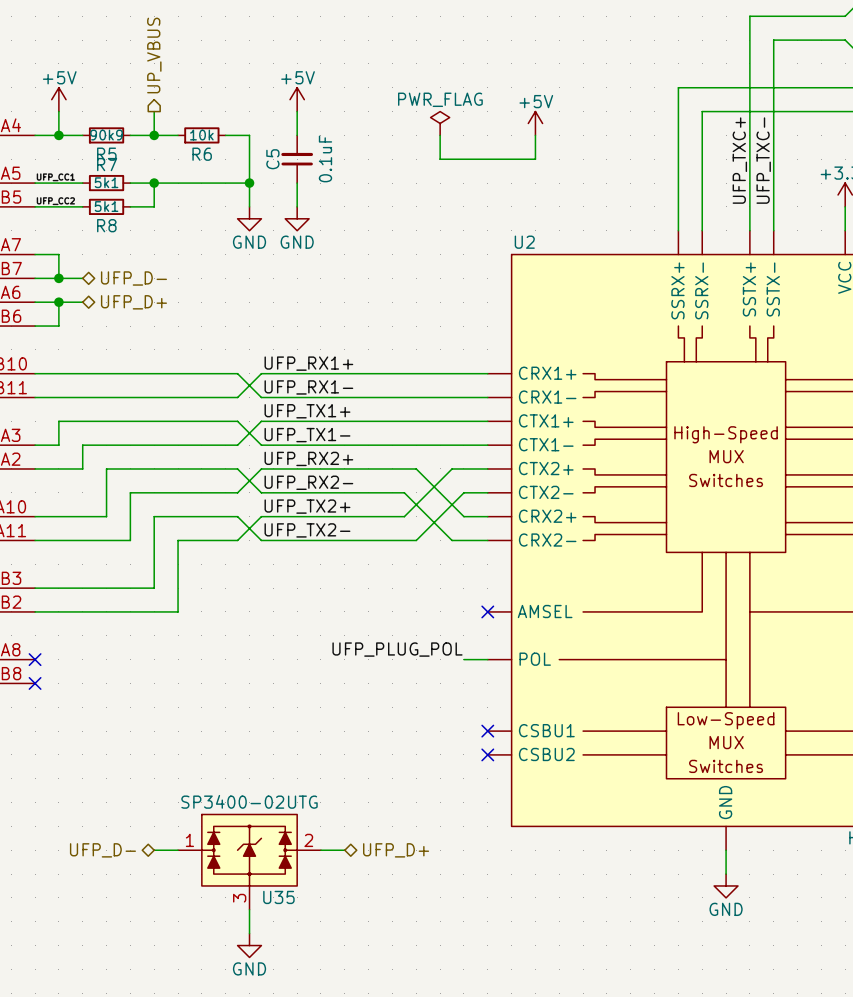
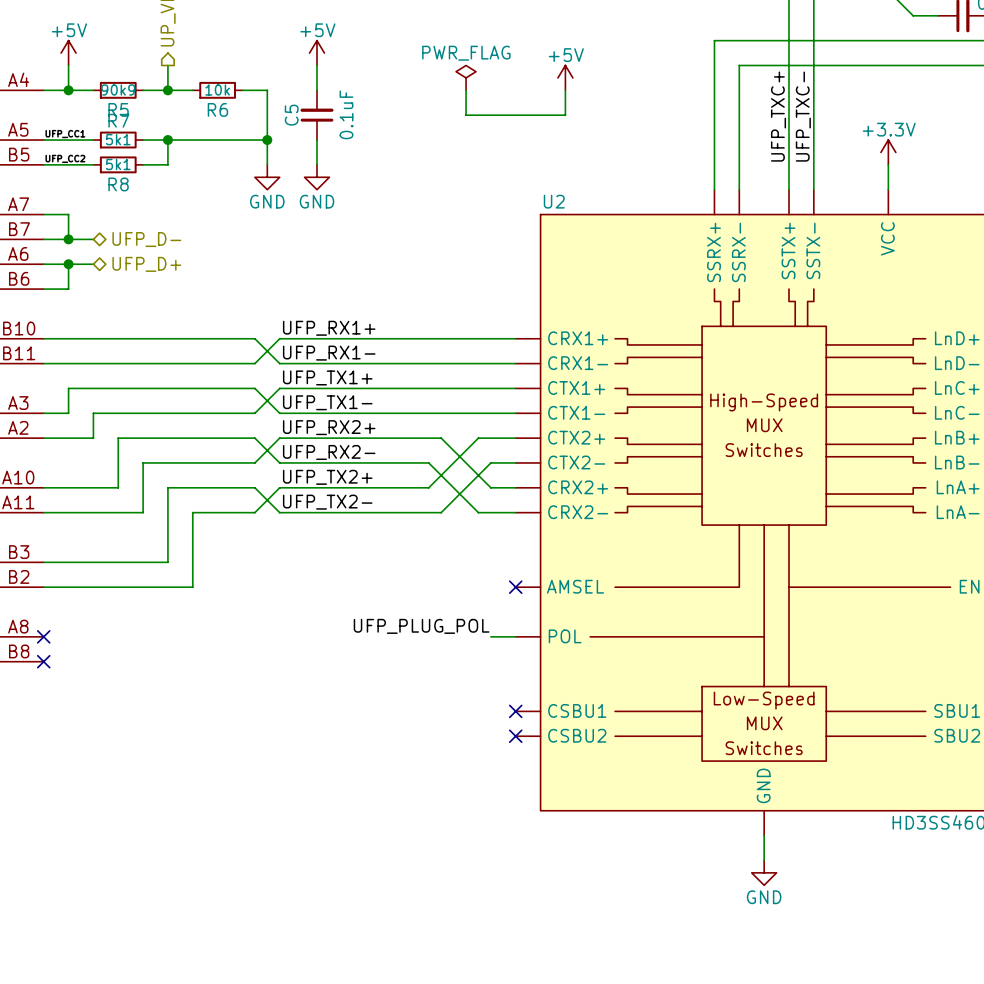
hierarchical label: UFP_D- (102, 850) -> none
wire: (154, 850) (178, 850) -> none
wire: (320, 850) (344, 850) -> none
hierarchical label: UFP_D+ (396, 850) -> none
U35: SP3400-02UTG (249, 861) -> none
wire: (249, 909) (249, 933) -> none
power symbol: GND (249, 945) -> none

